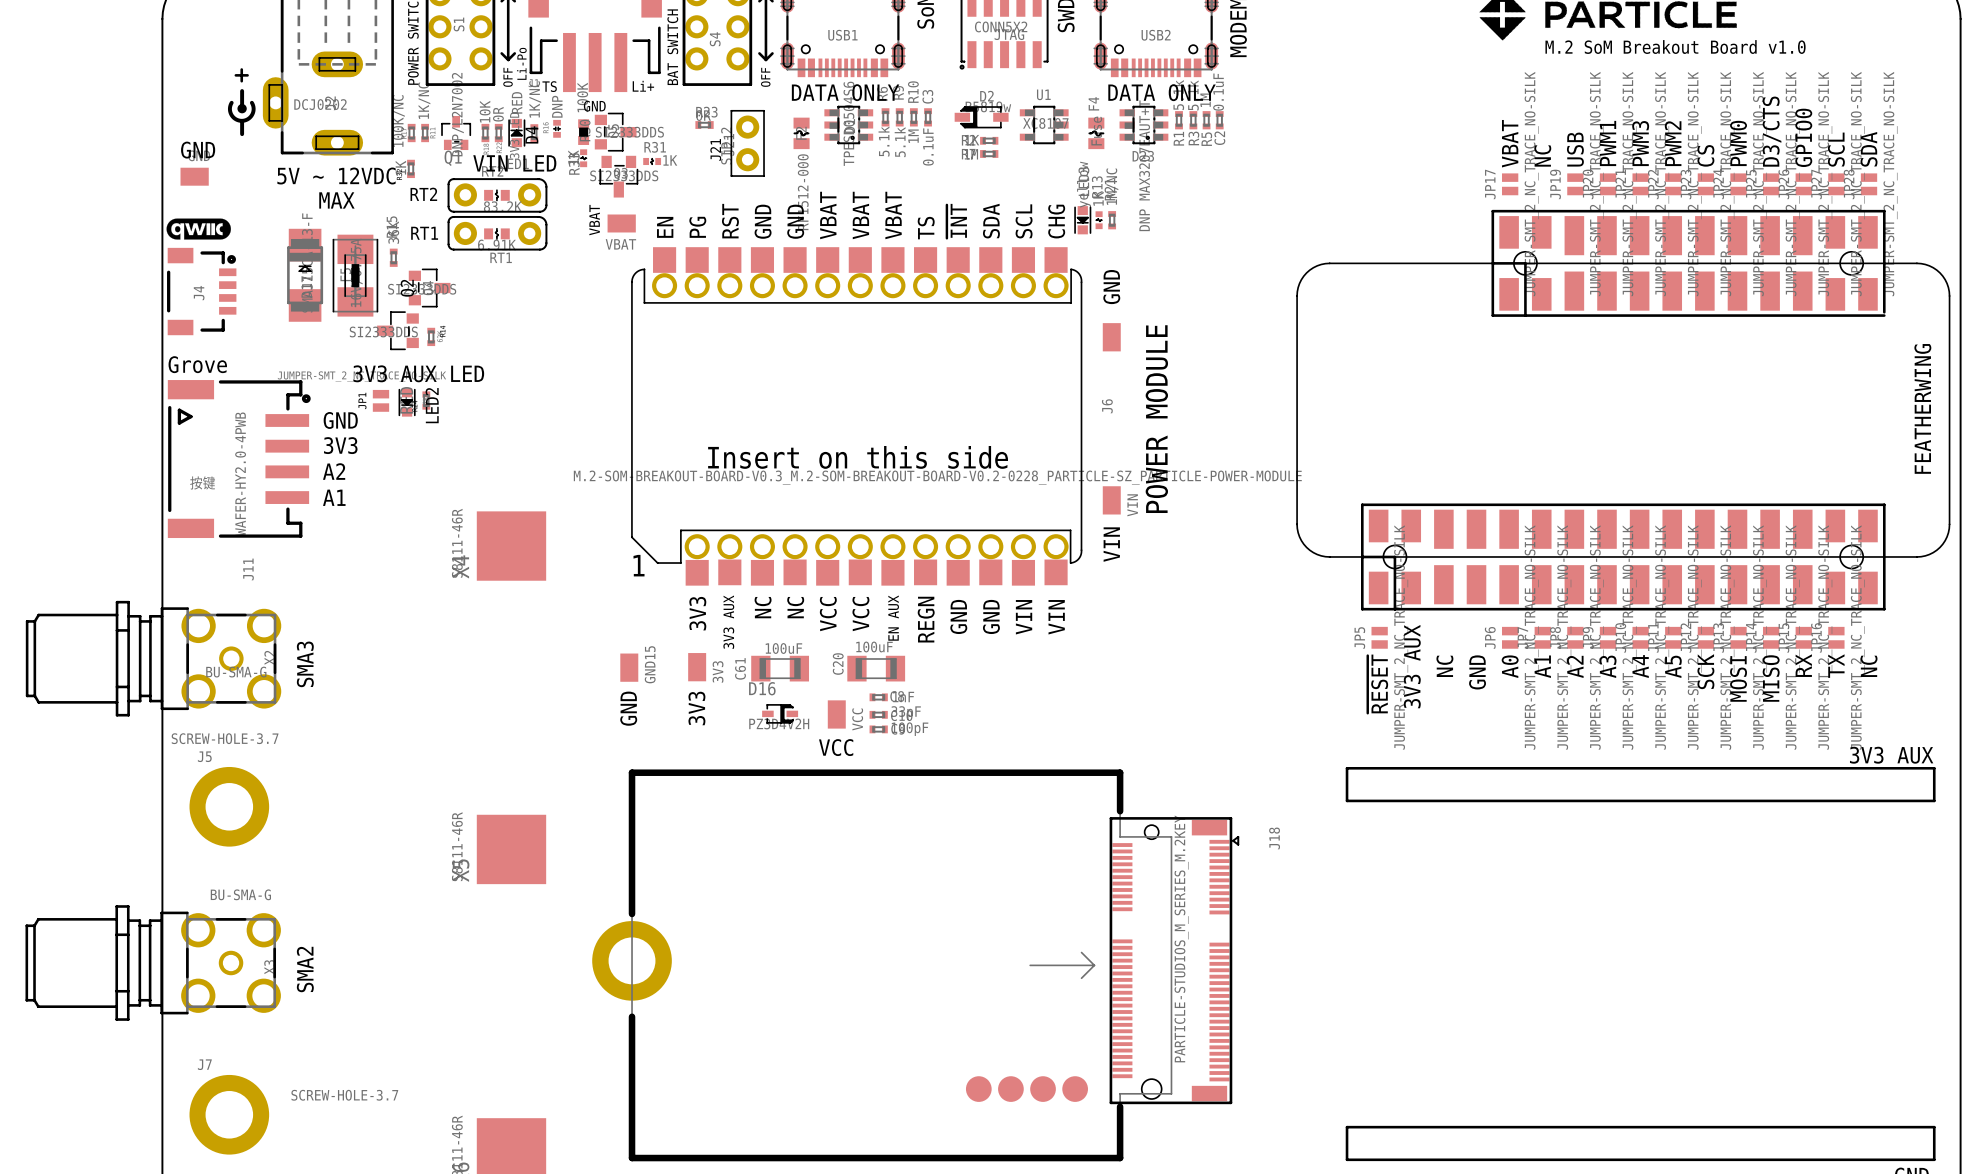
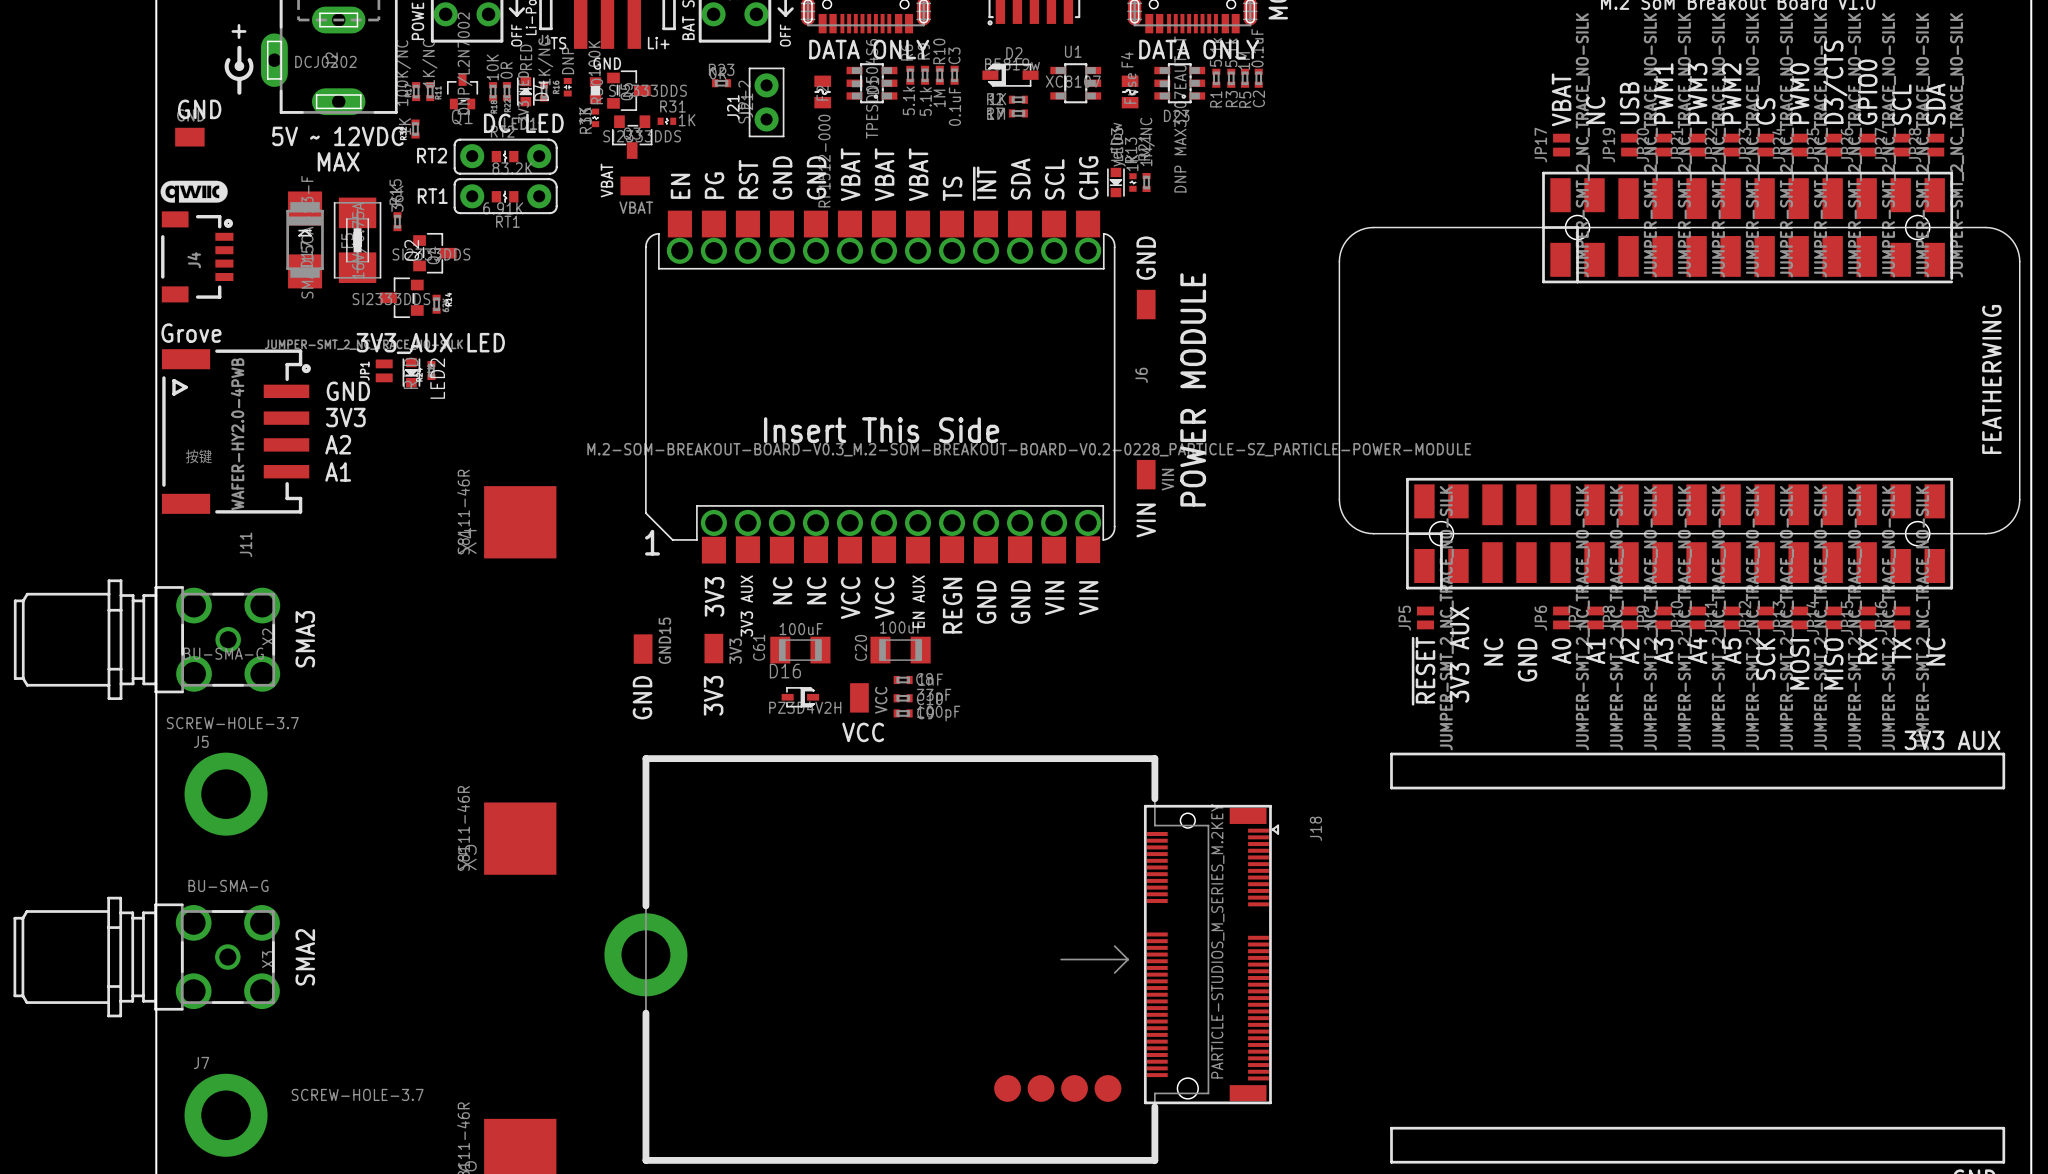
text: VIN LED (514, 163) -> DC LED (523, 123)
text: 3V3 AUX LED (418, 373) -> 3V3_AUX LED (430, 343)
text: Insert on this side (858, 457) -> Insert This Side (881, 430)

